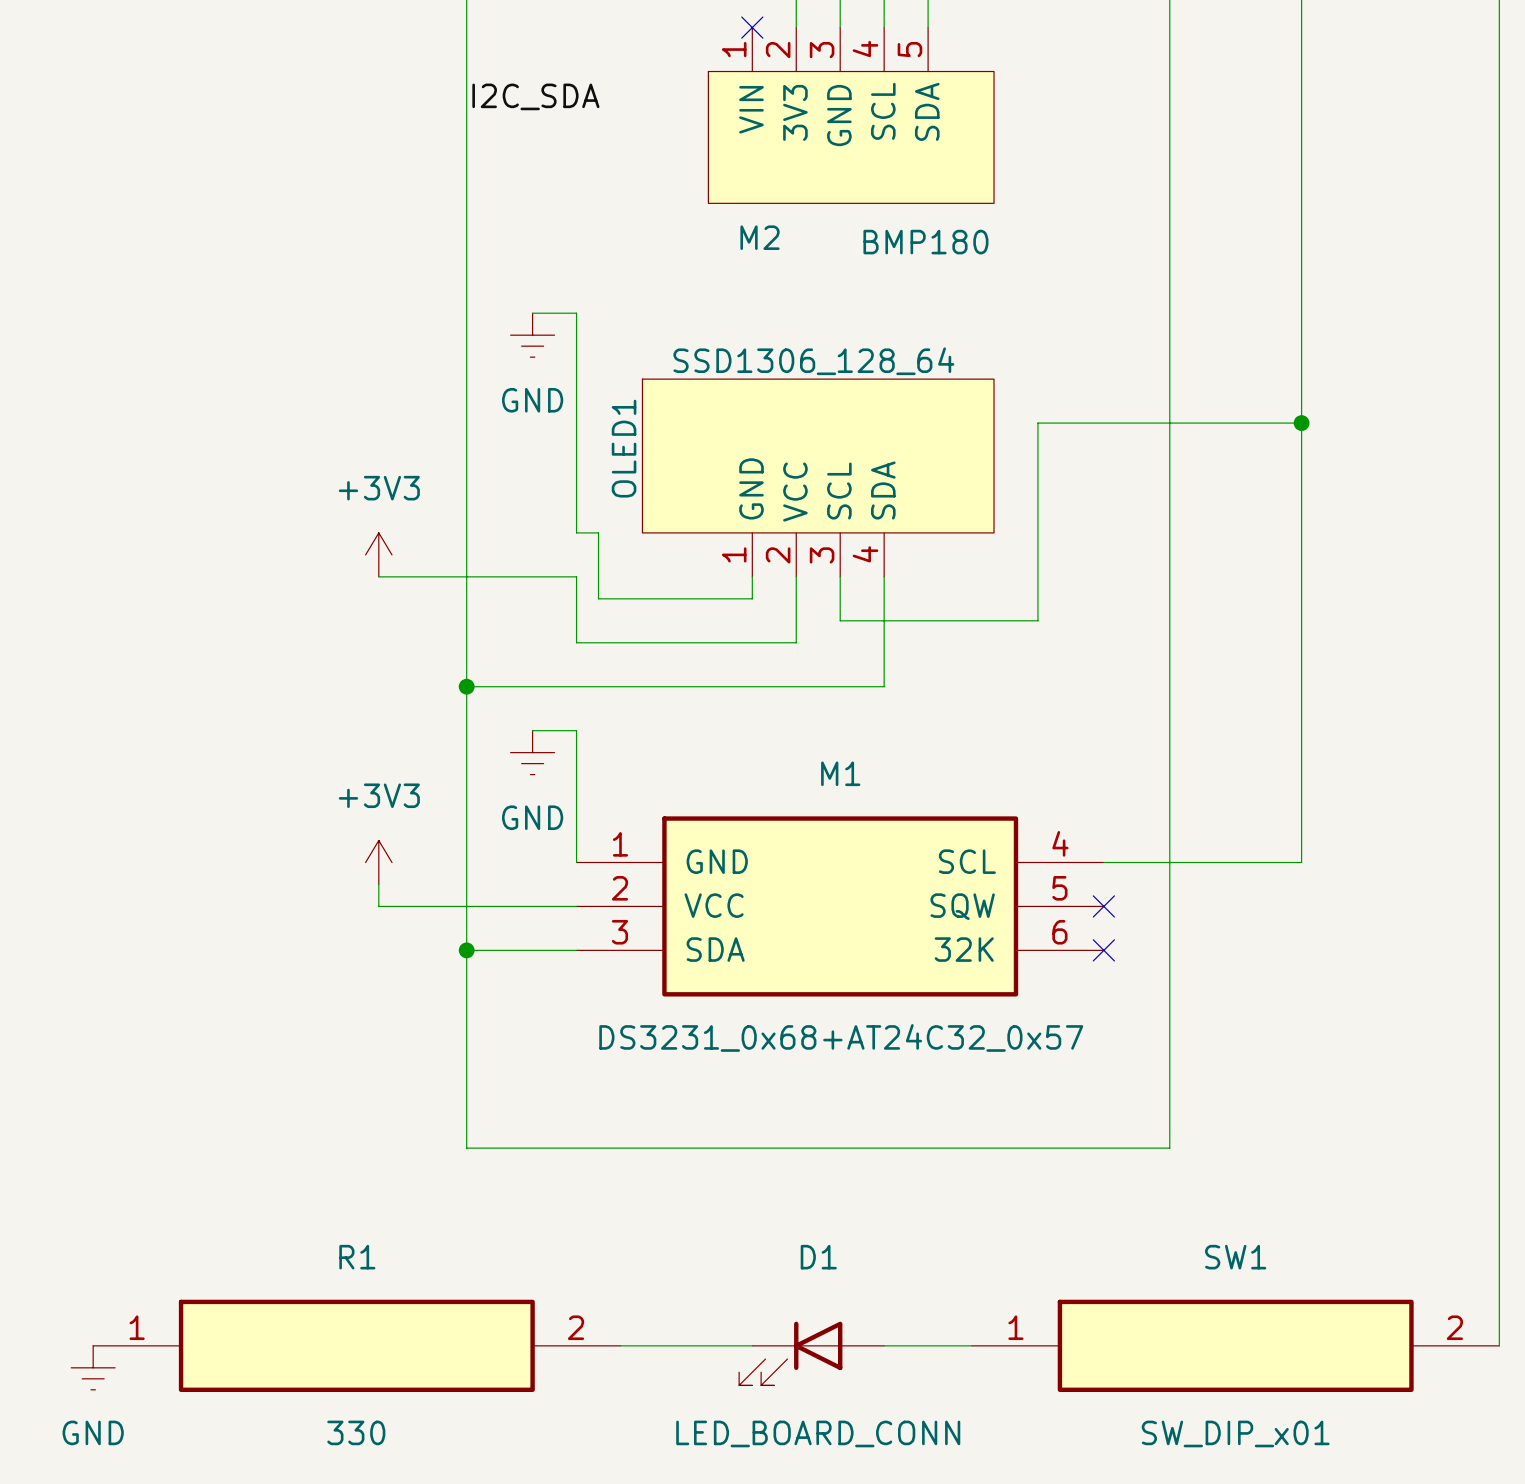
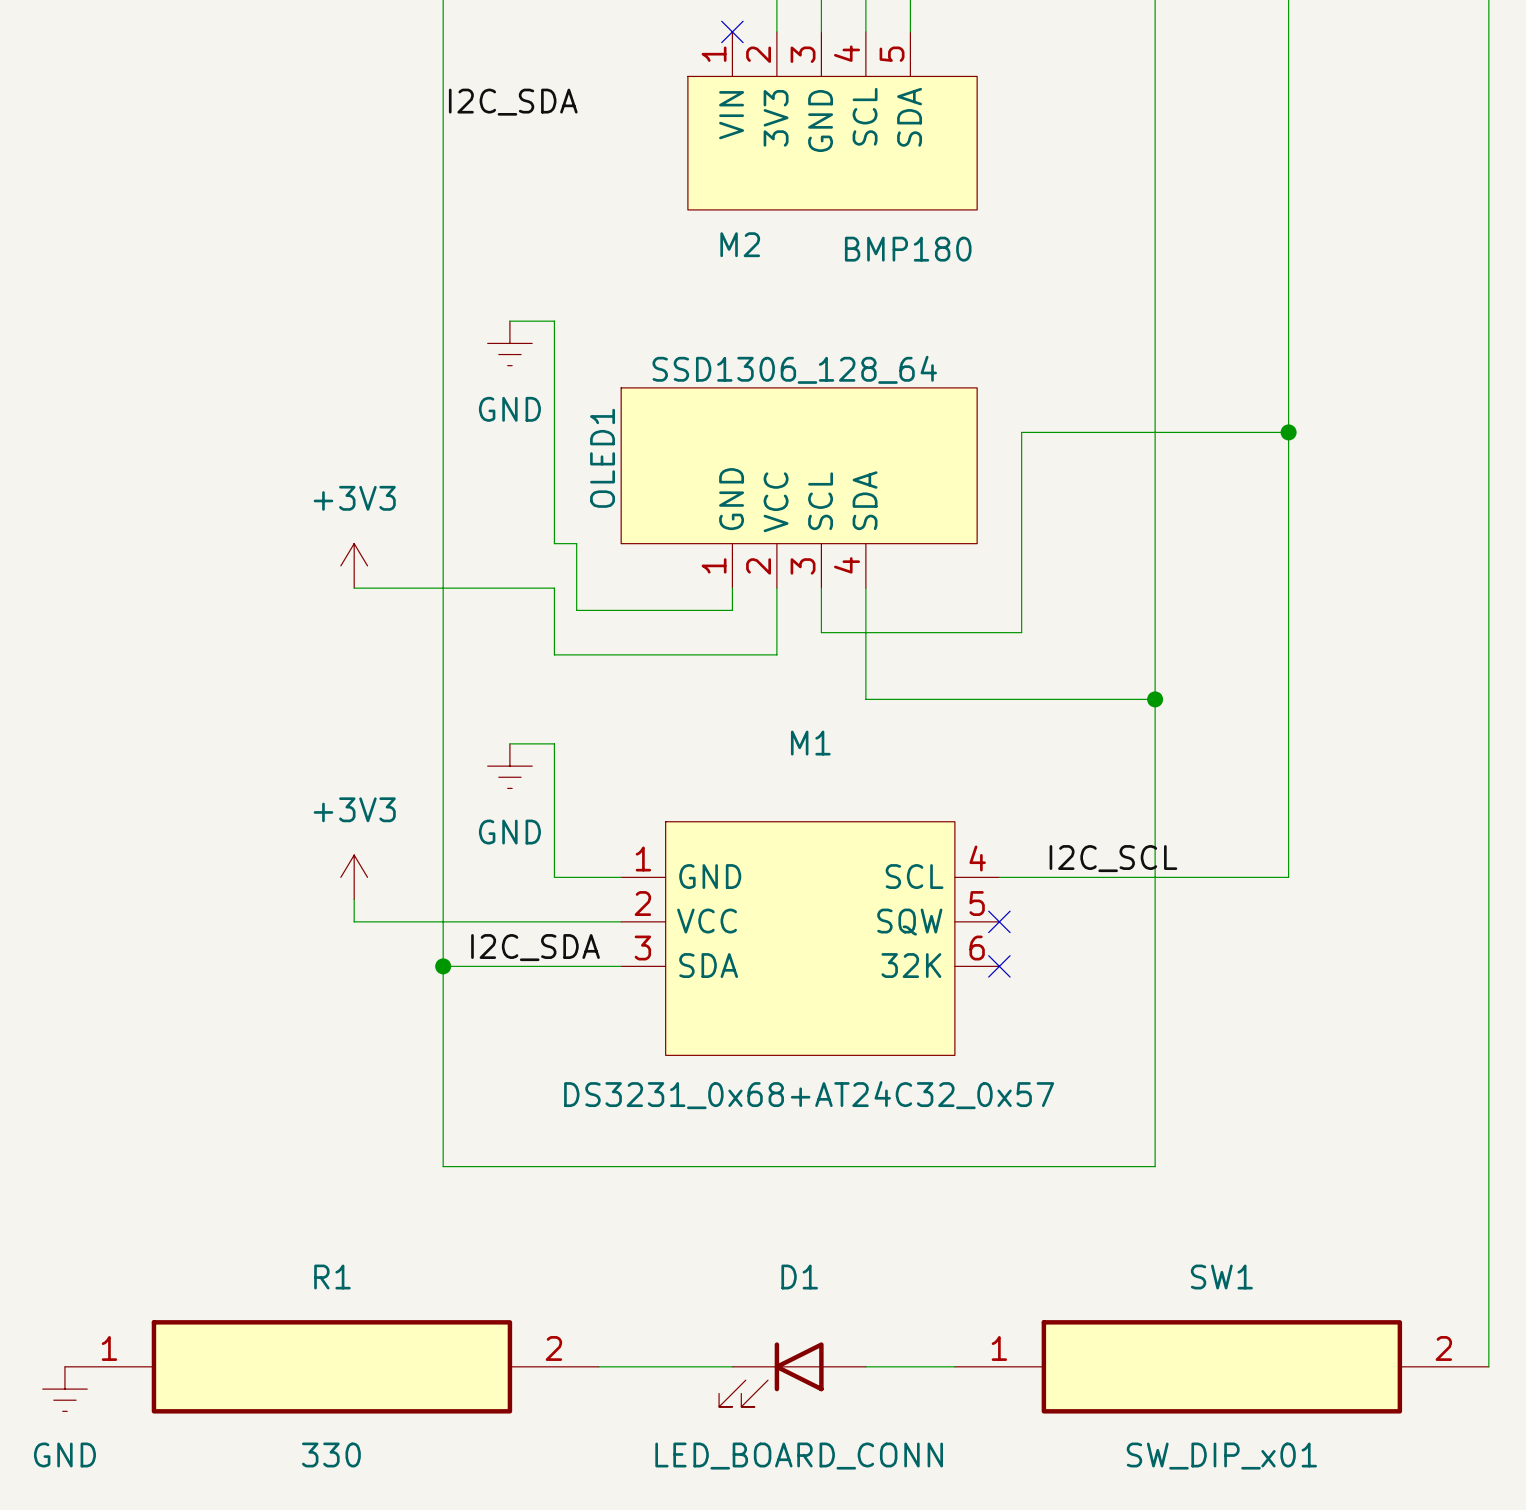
wire: (466, 686) (884, 686) -> (1155, 699) (865, 699)
junction: (466, 686) -> none
junction: none -> (1155, 699)
M1 name position: M1 (840, 773) -> M1 (810, 743)
M1 symbol: [576, 816, 1104, 997] -> [621, 821, 1000, 1056]
label: none -> I2C_SCL (1113, 858)
no-connect mark: none -> (999, 921)
no-connect mark: (1103, 906) -> none
label: none -> I2C_SDA (535, 947)
no-connect mark: none -> (999, 966)
no-connect mark: (1103, 950) -> none

